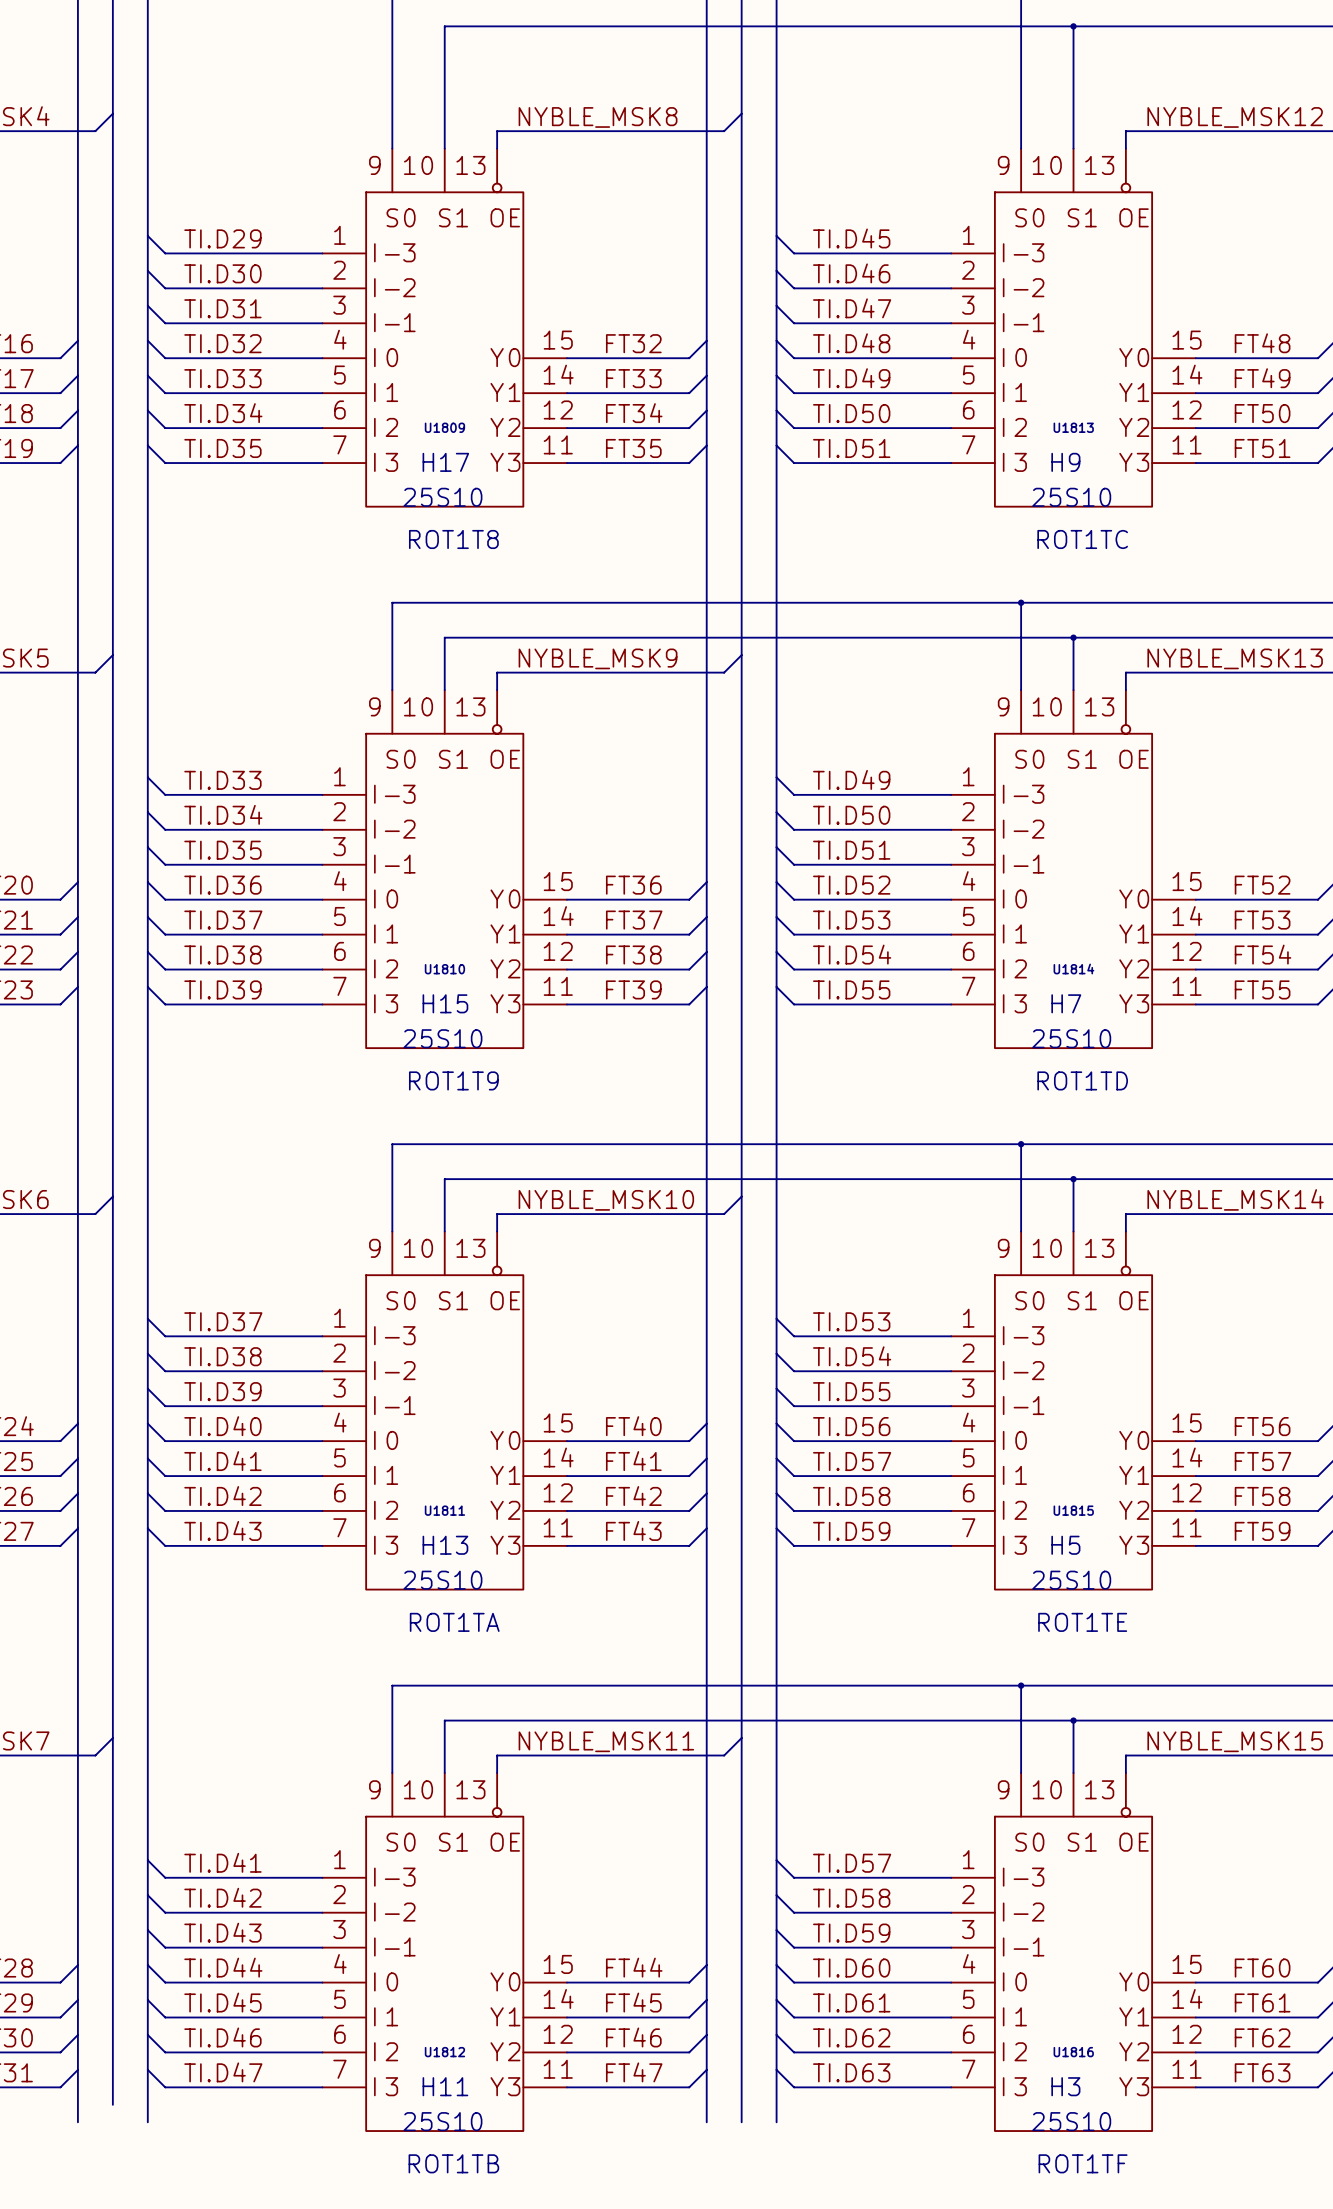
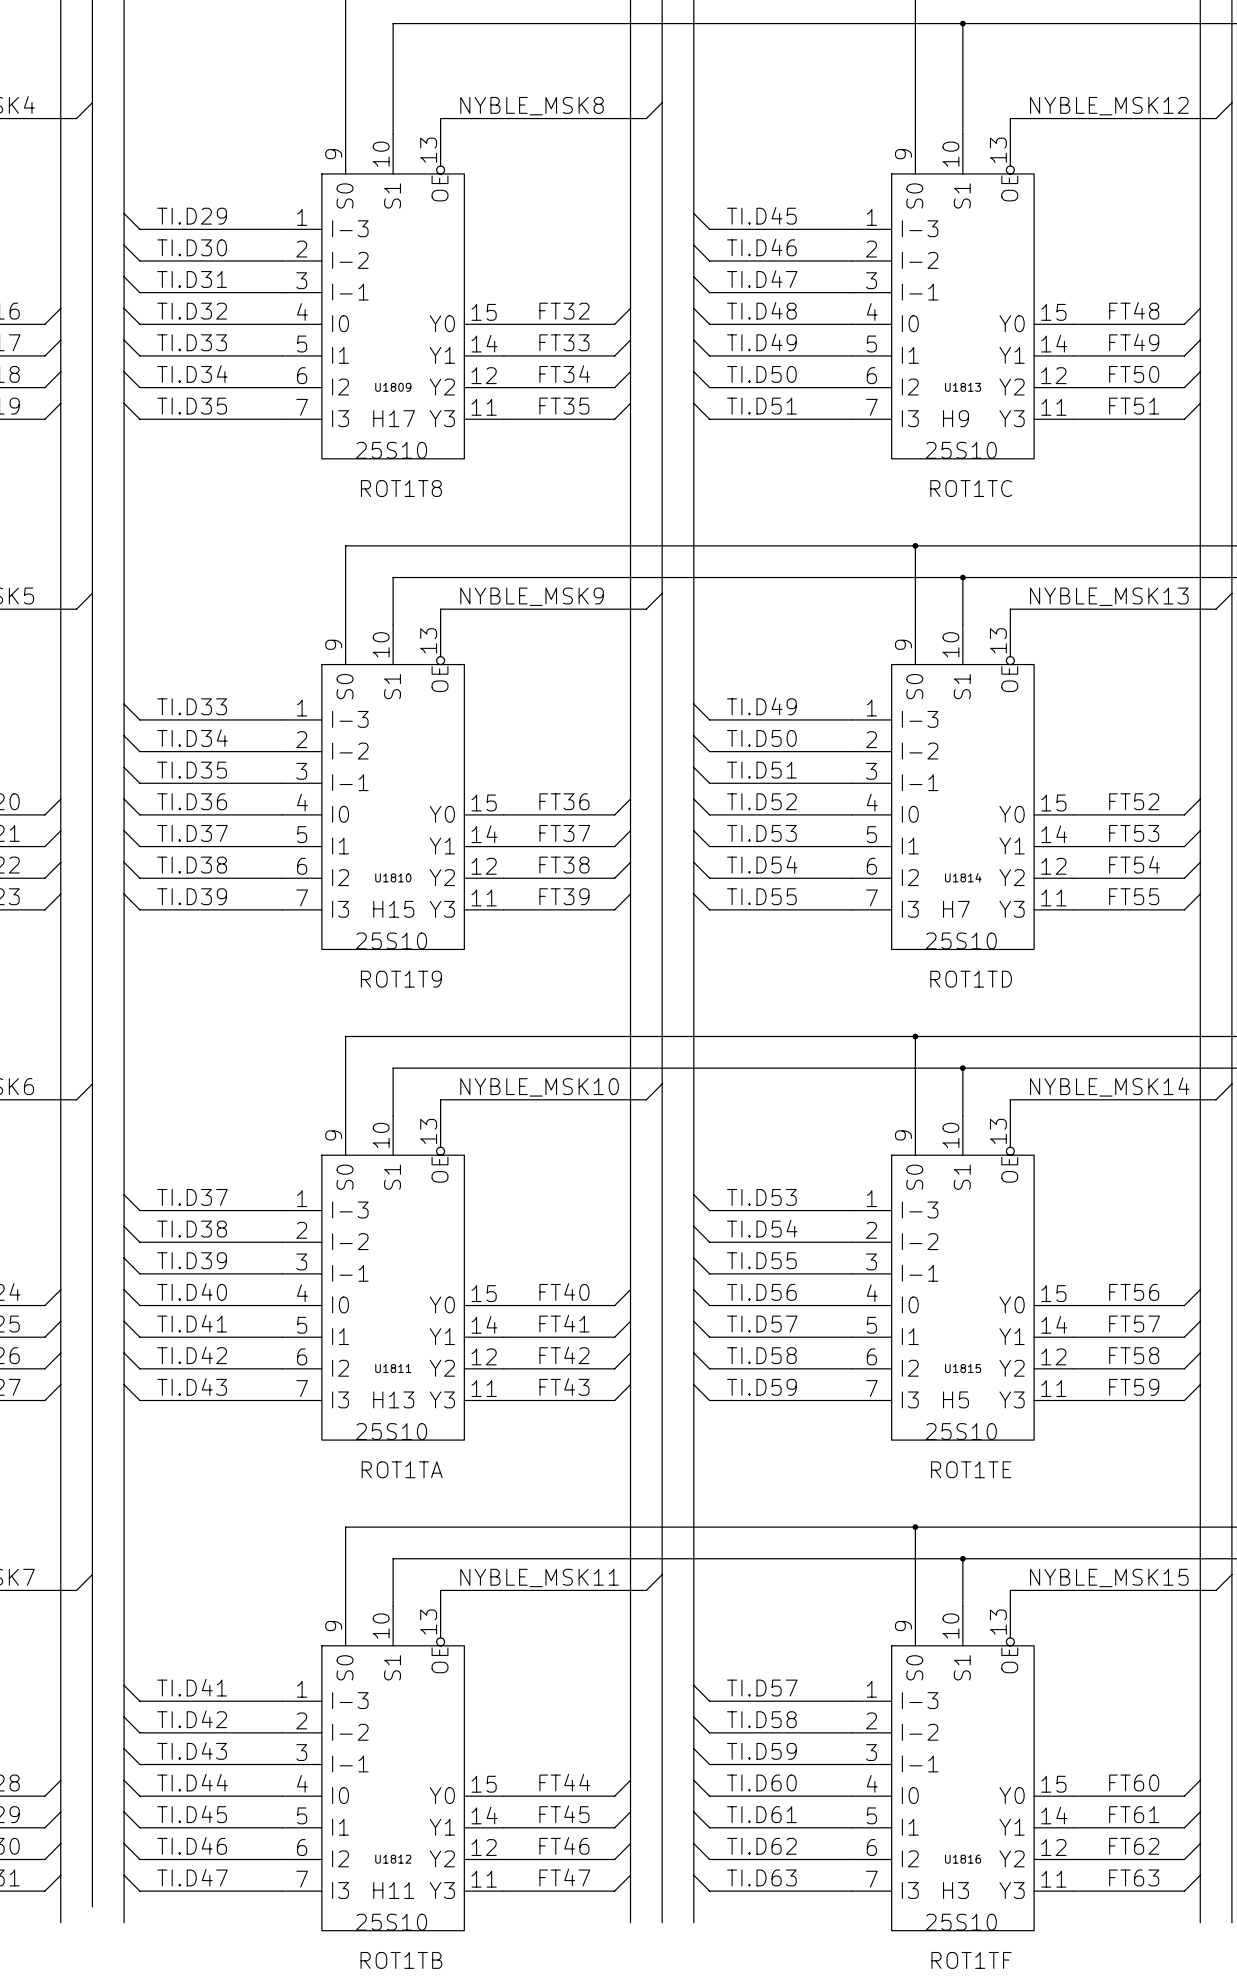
U1809 symbol: [322, 148, 567, 507] -> [282, 134, 504, 459]
U1813 symbol: [951, 148, 1196, 507] -> [852, 134, 1074, 459]
U1810 symbol: [322, 690, 567, 1049] -> [282, 625, 504, 950]
U1814 symbol: [951, 690, 1196, 1049] -> [852, 625, 1074, 950]
U1811 symbol: [322, 1231, 567, 1590] -> [282, 1115, 504, 1441]
U1815 symbol: [951, 1231, 1196, 1590] -> [852, 1115, 1074, 1441]
U1812 symbol: [322, 1772, 567, 2132] -> [282, 1606, 504, 1931]
U1816 symbol: [951, 1772, 1196, 2132] -> [852, 1606, 1074, 1931]

